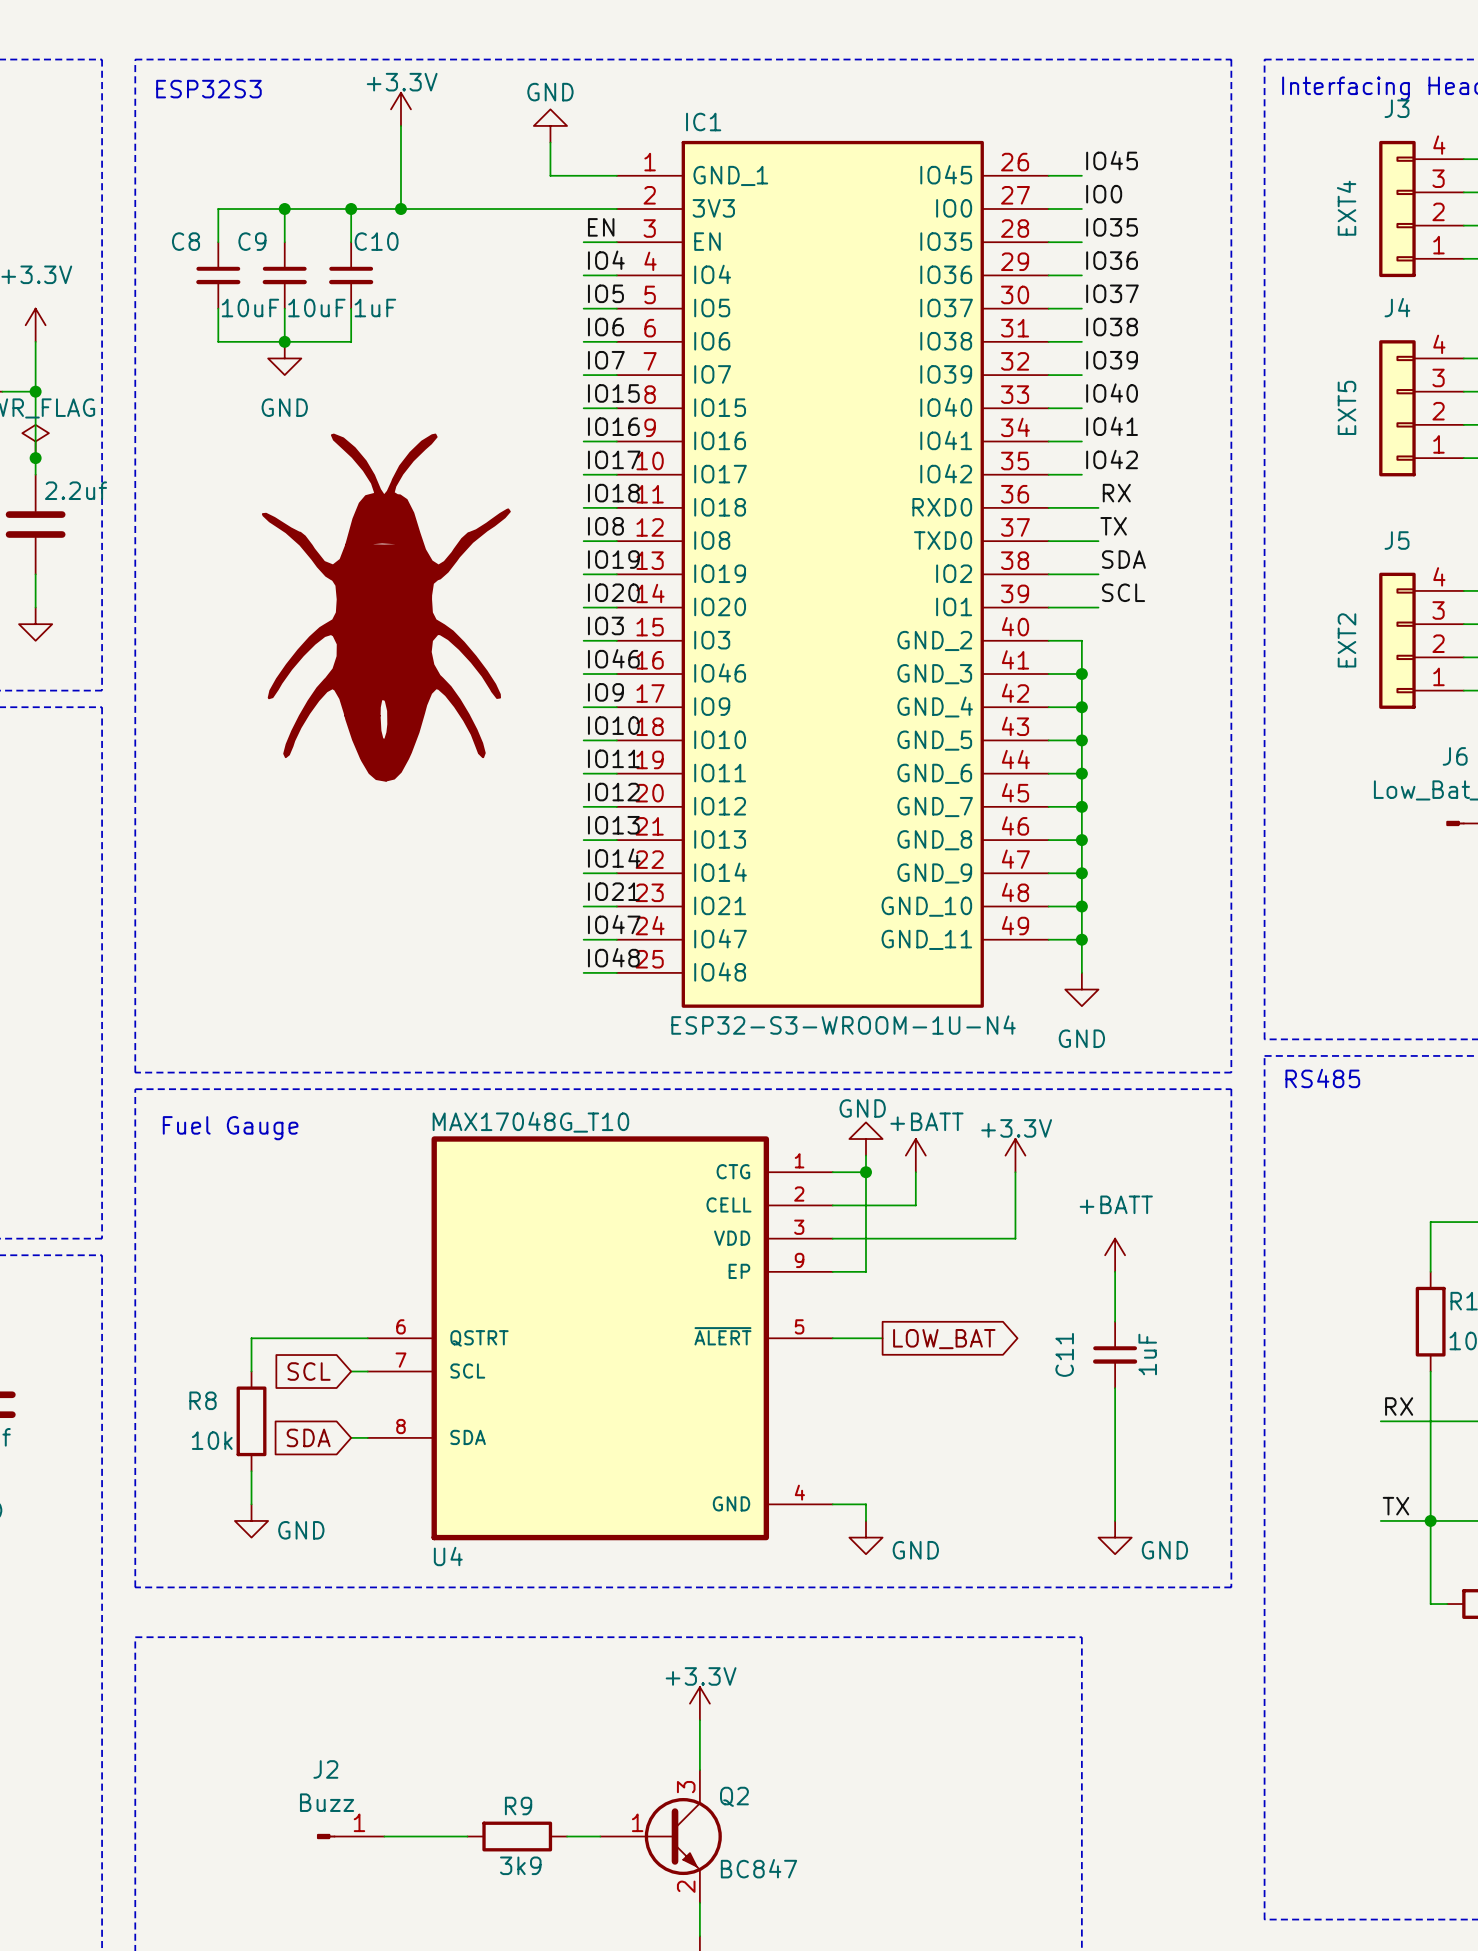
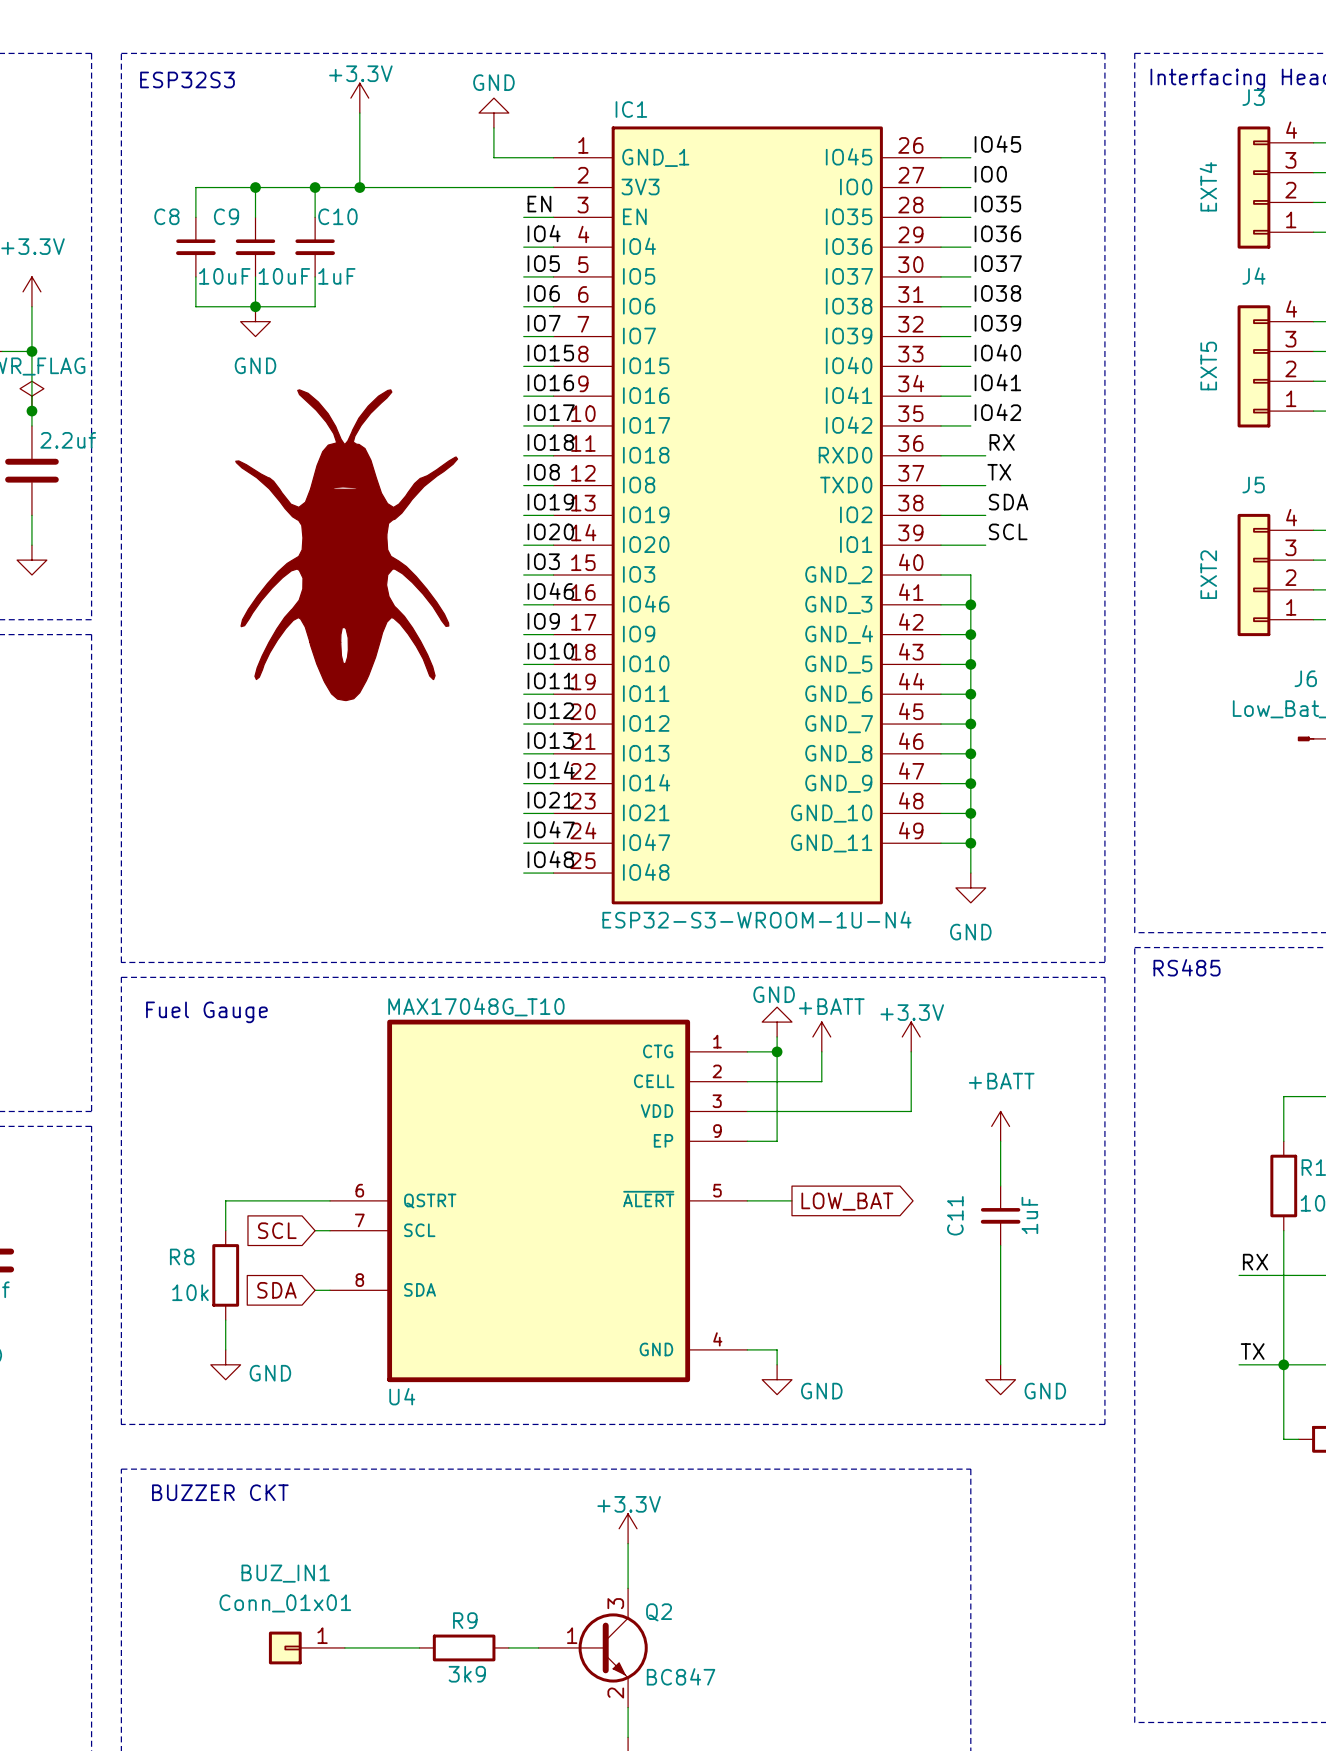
text: none -> BUZZER CKT (220, 1492)
BUZ_IN1: none -> Conn_01x01 (306, 1647)
J2: Buzz (350, 1836) -> none

